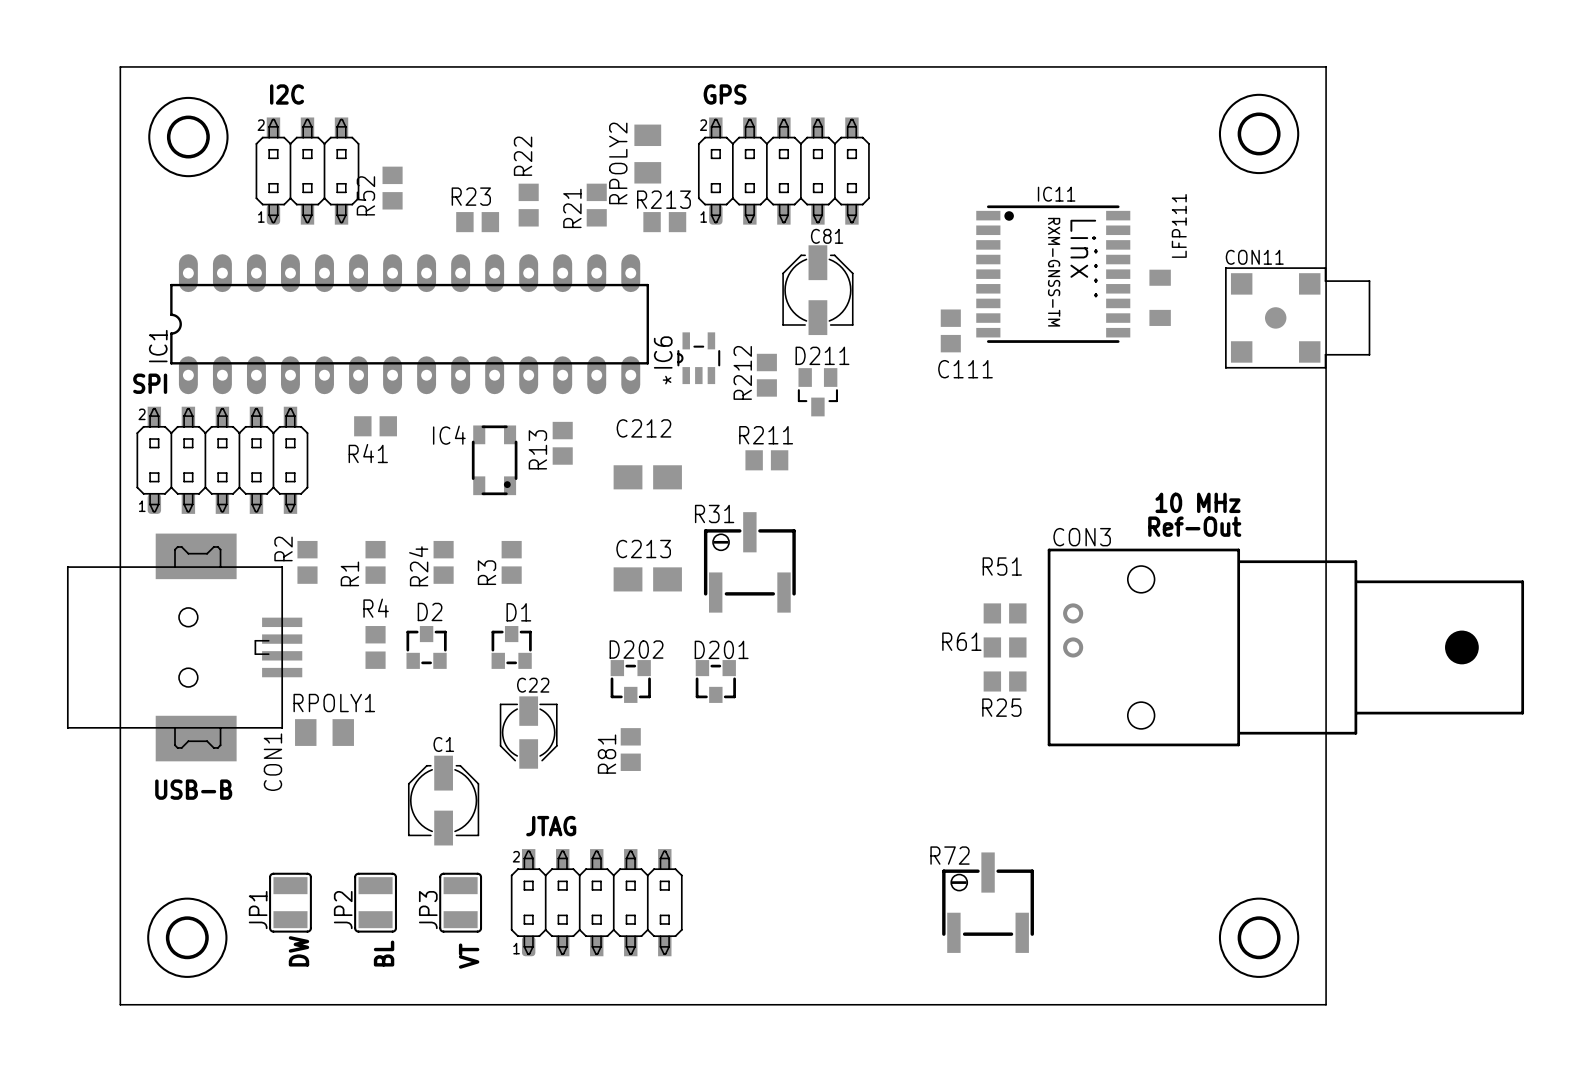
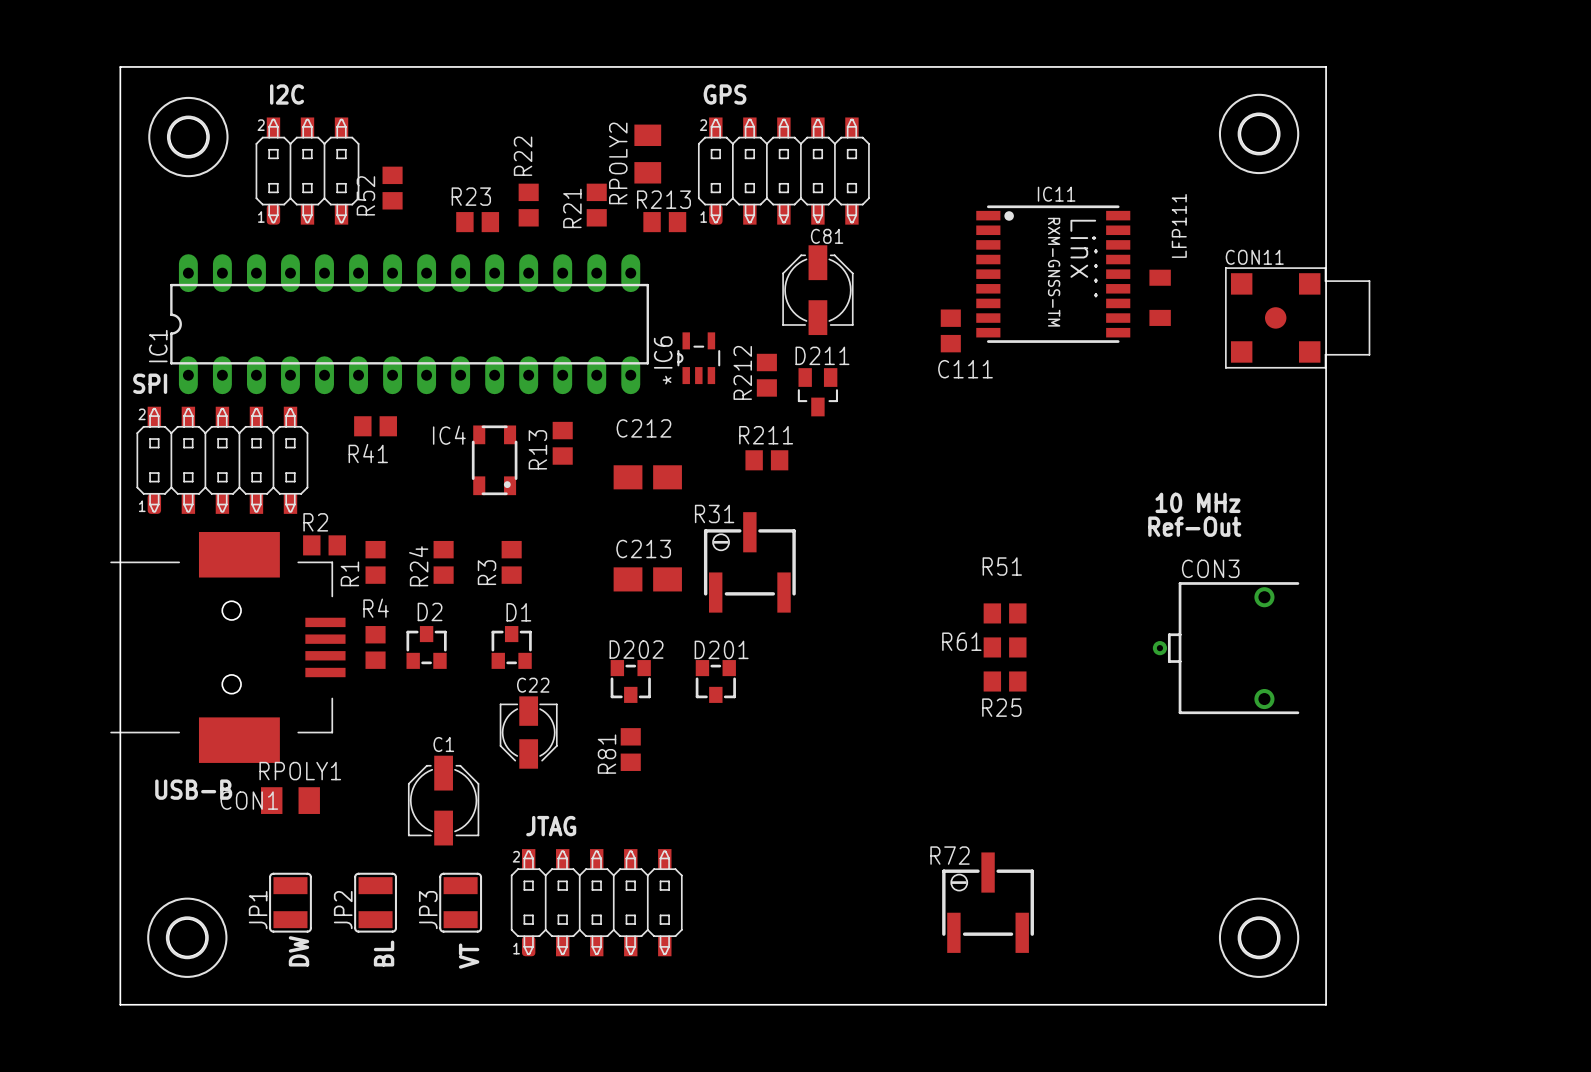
CON1 footprint: [66, 533, 303, 762] -> [110, 531, 346, 763]
CON3 name position: CON3 (1082, 537) -> CON3 (1210, 568)
CON3 footprint: [1047, 548, 1525, 747] -> [1152, 582, 1300, 715]
R2 rotation: 0° (307, 562) -> 90° clockwise (324, 545)
RPOLY1 position: (324, 732) -> (290, 800)
CON1 name position: CON1 (272, 762) -> CON1 (249, 800)

